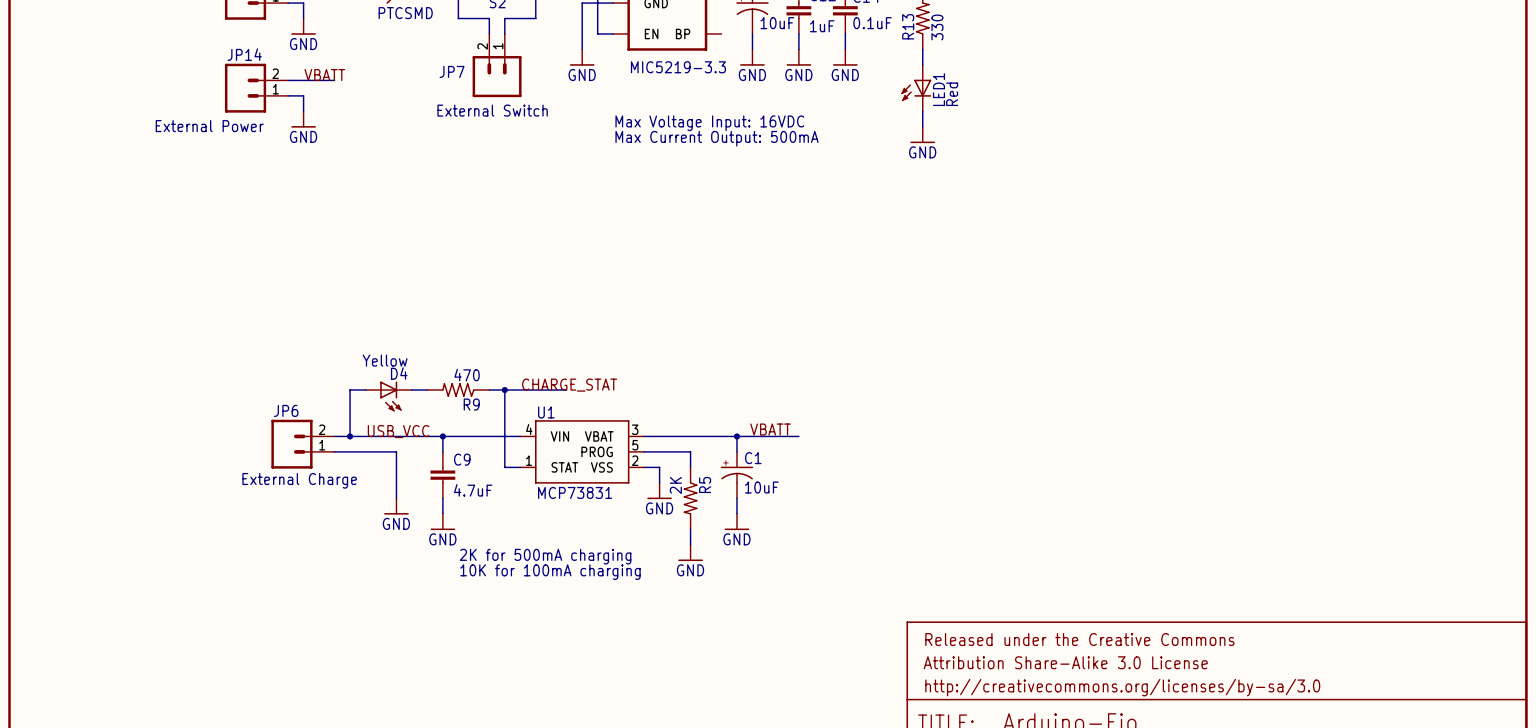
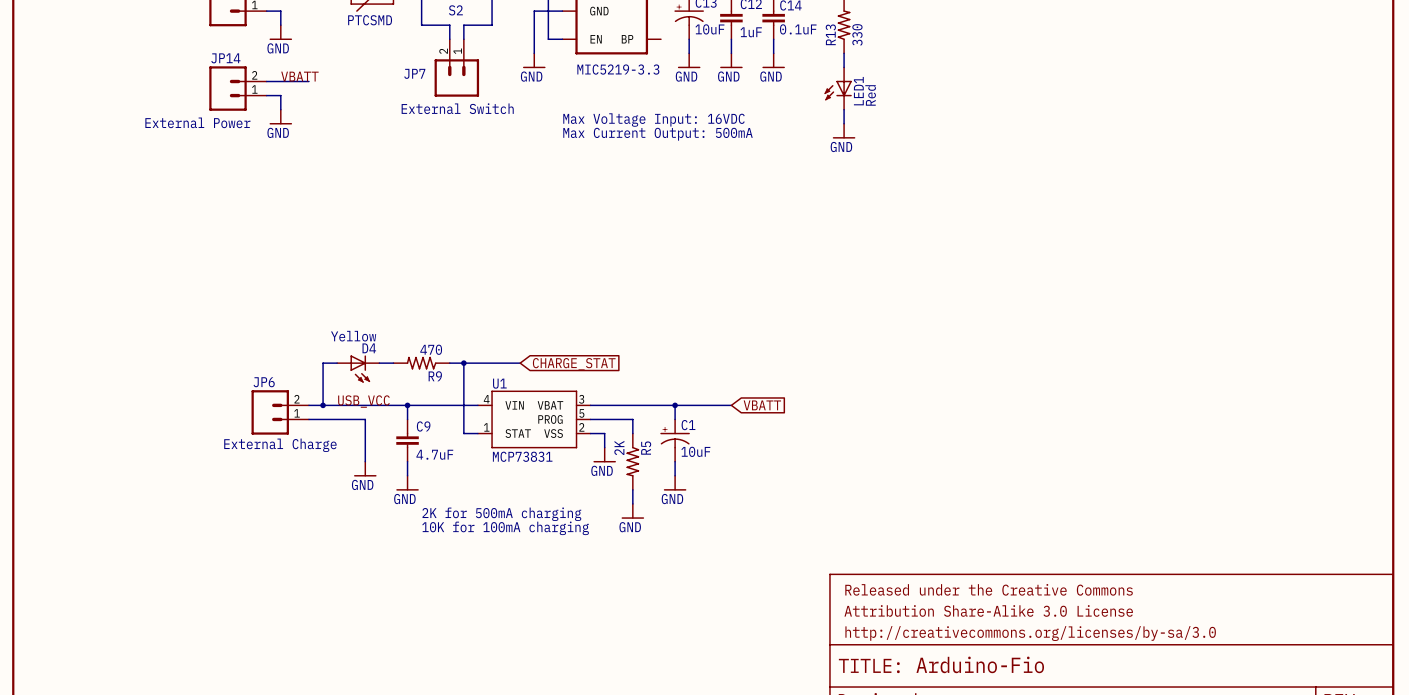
label: CHARGE_STAT (569, 385) -> none
global label: none -> CHARGE_STAT (574, 364)
label: VBATT (770, 429) -> none
global label: none -> VBATT (762, 405)

